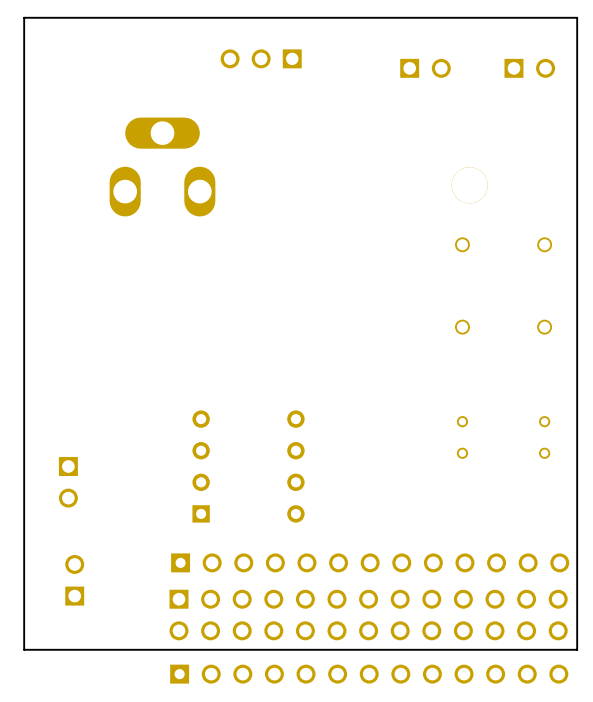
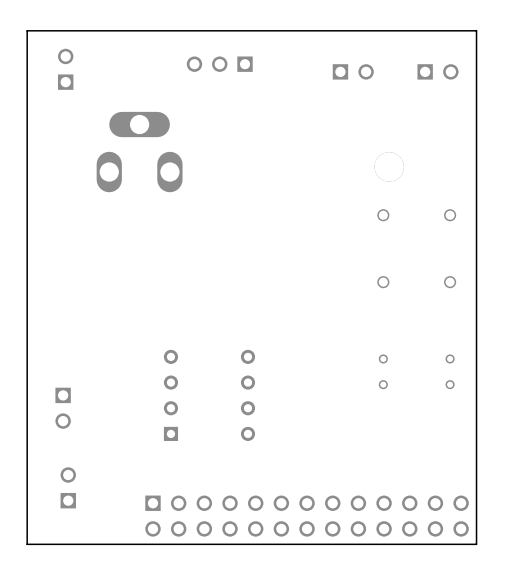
part: none -> (65, 69)
part: (370, 562) -> none
part: (369, 674) -> none

